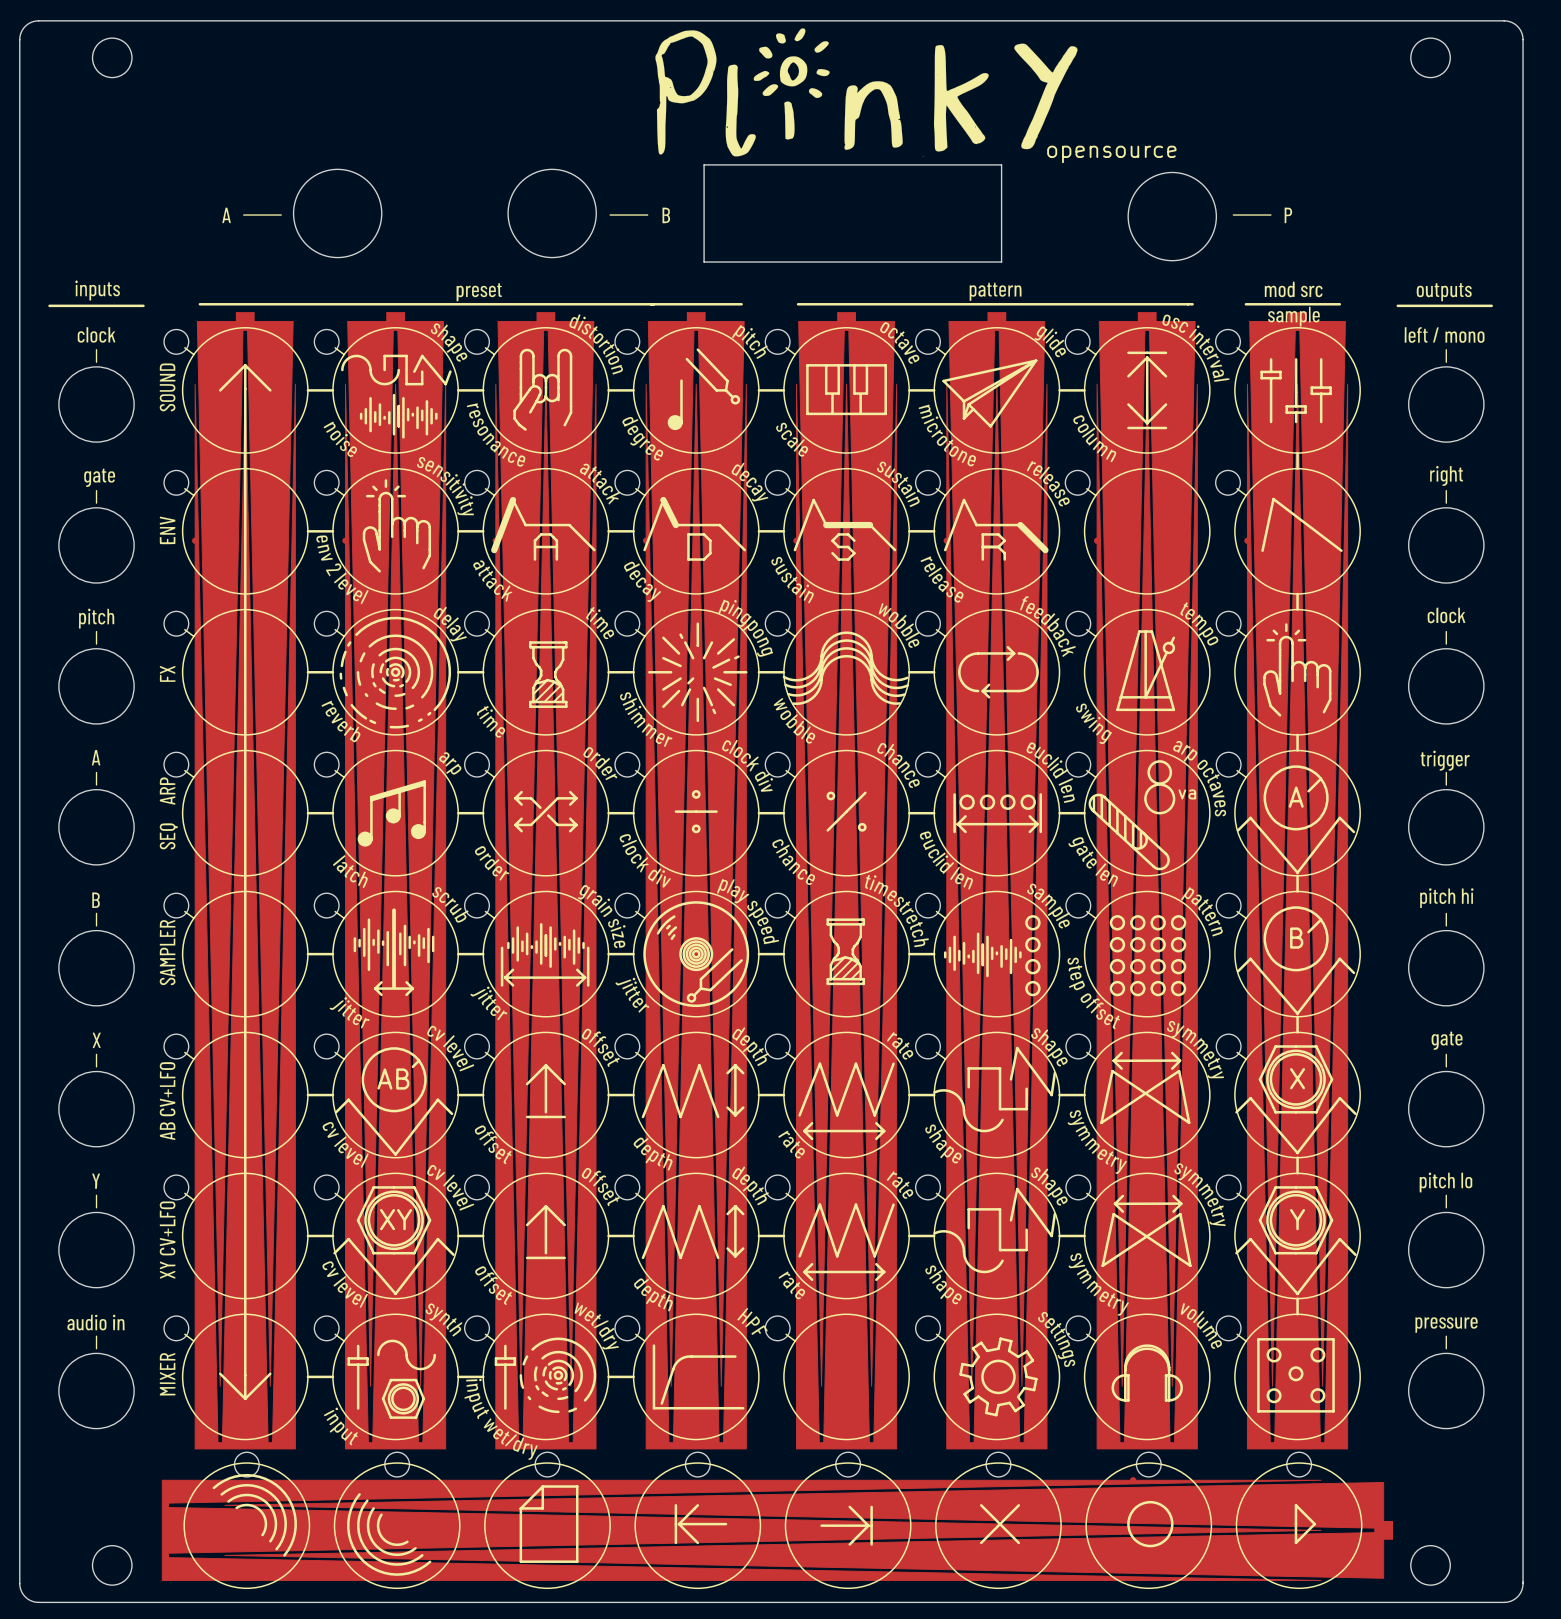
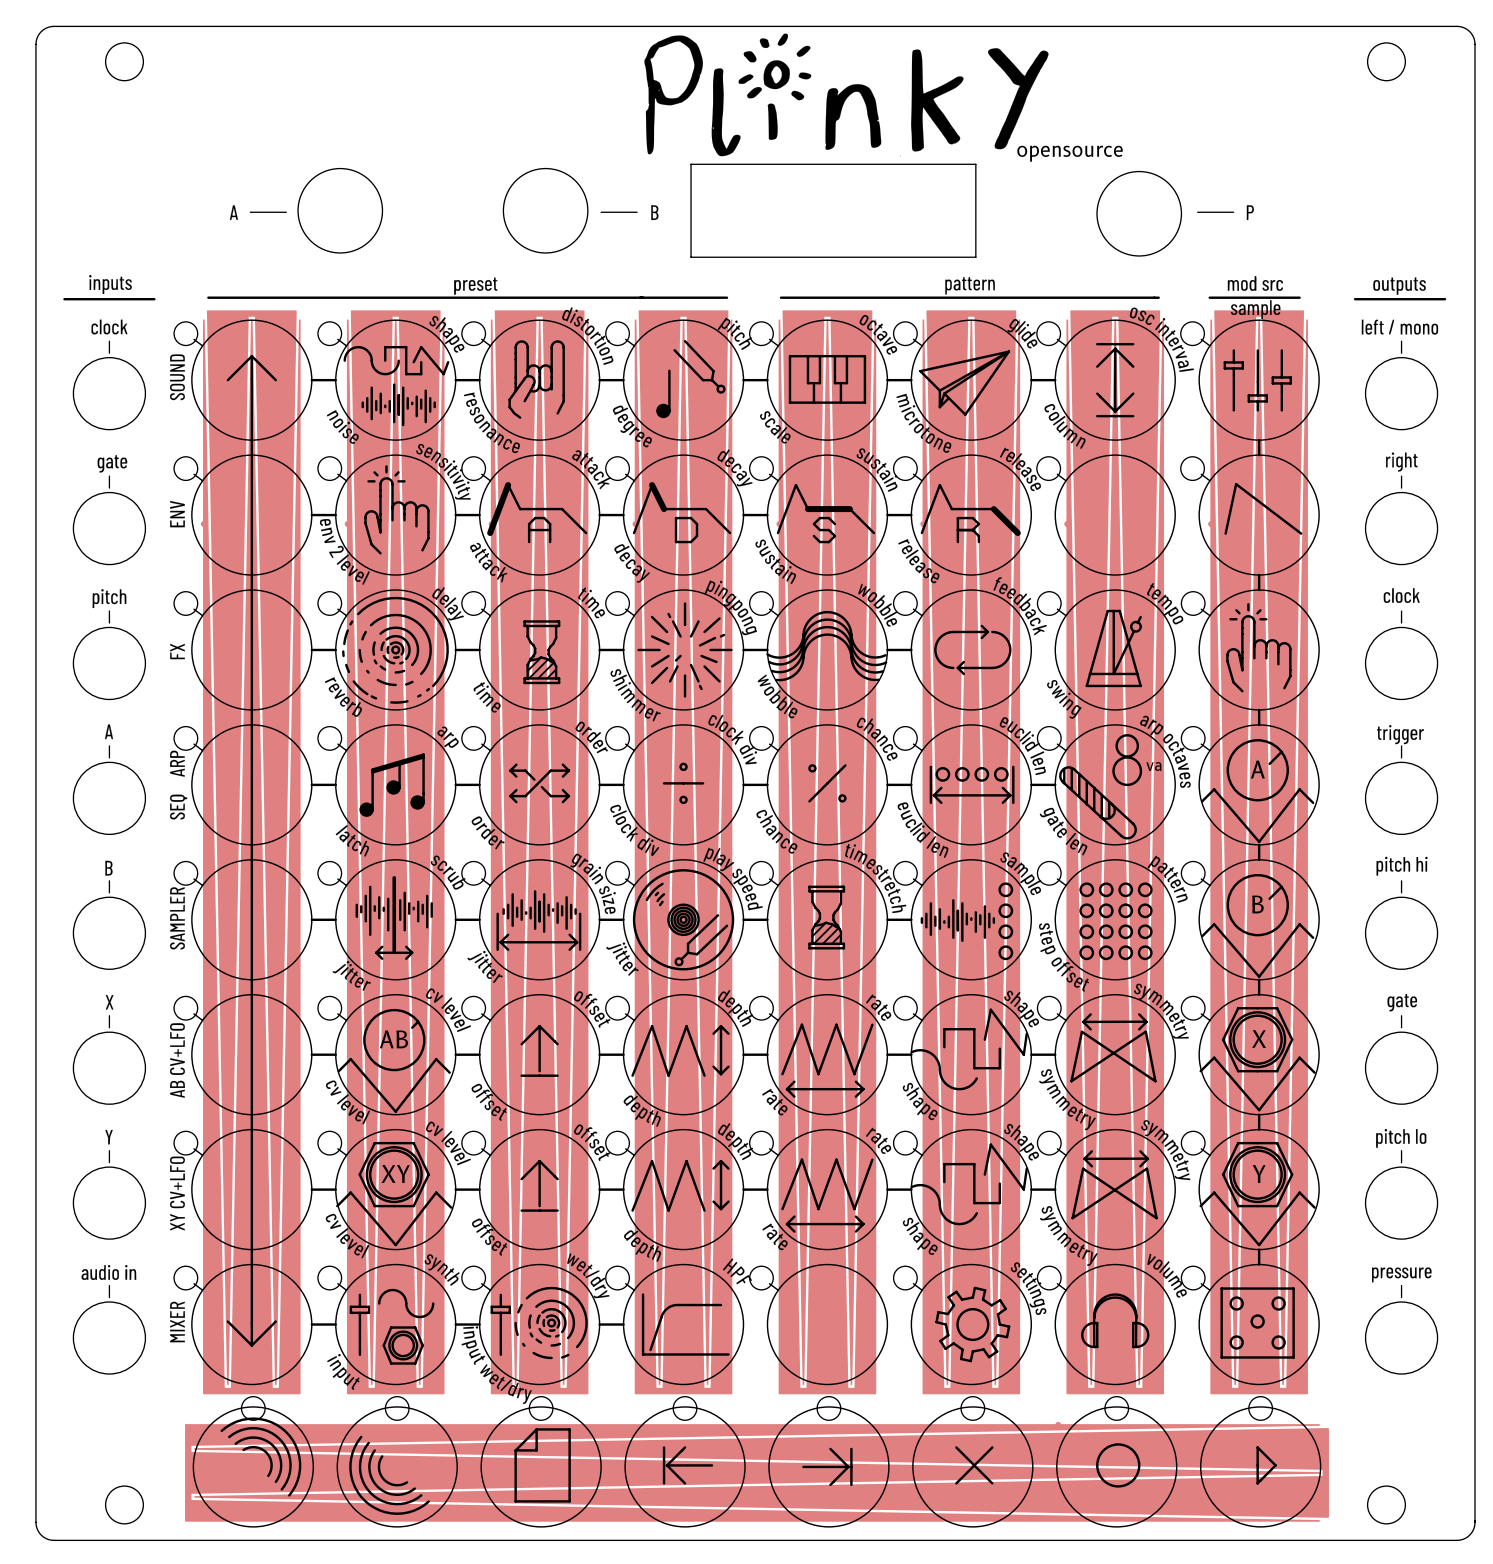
part footprint: [181, 312, 1361, 1450] -> [191, 310, 1320, 1395]
part footprint: [161, 1462, 1394, 1590] -> [185, 1406, 1329, 1528]

